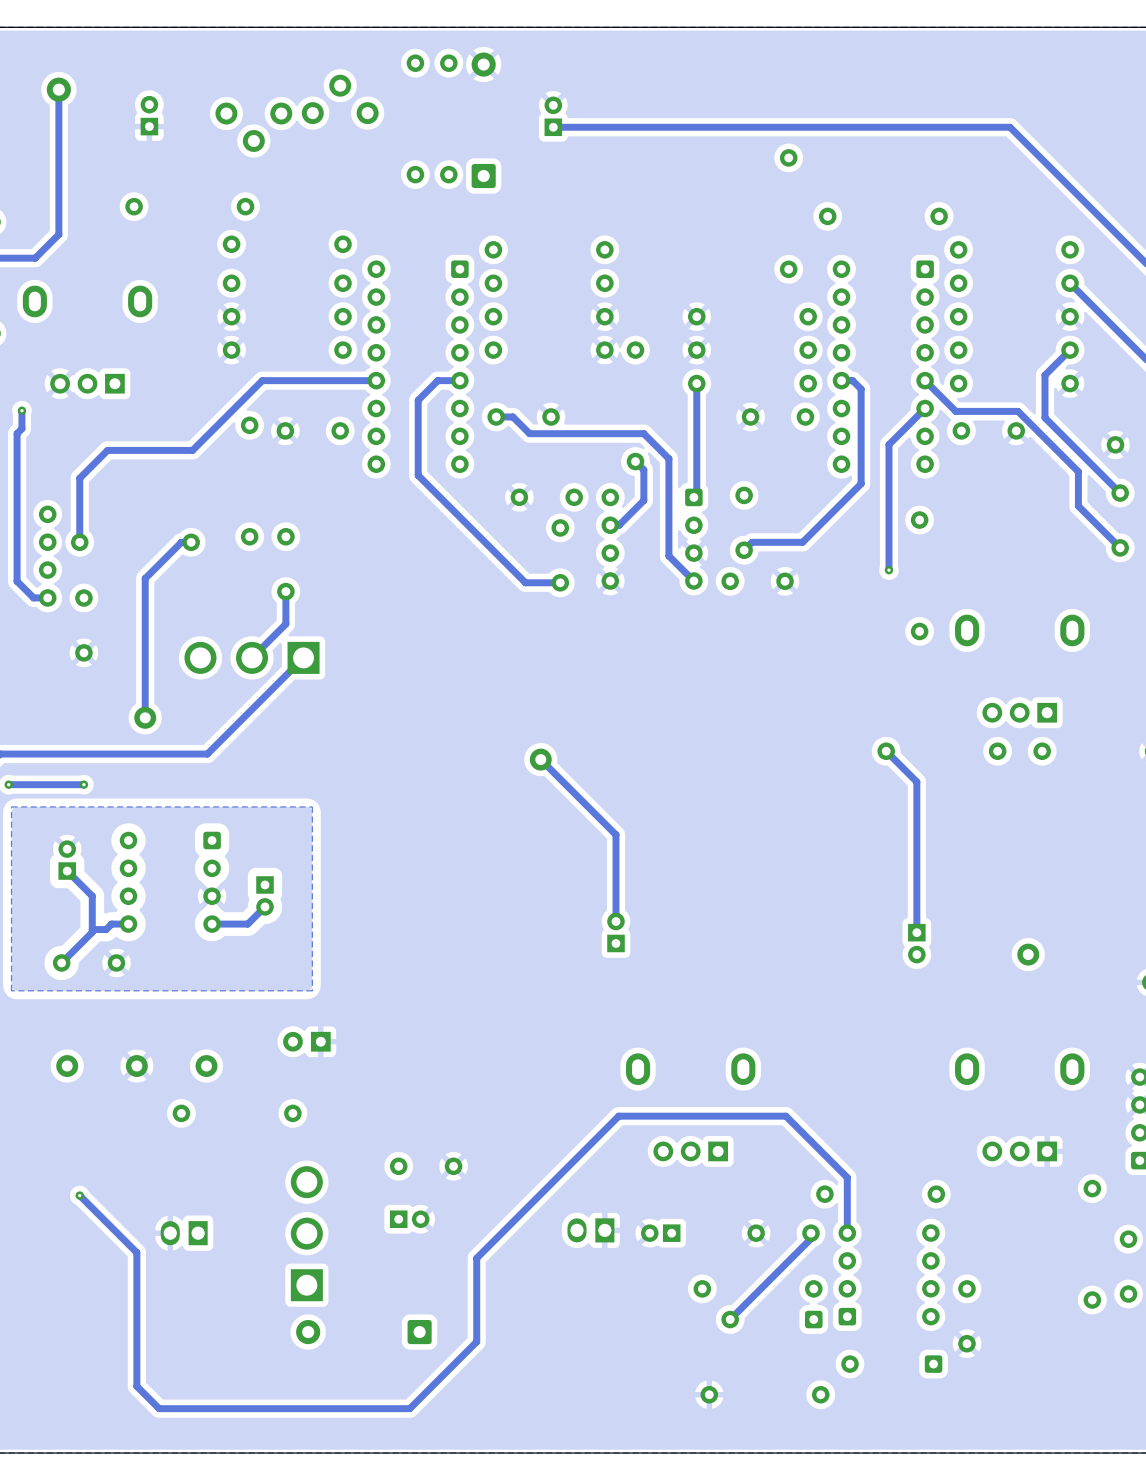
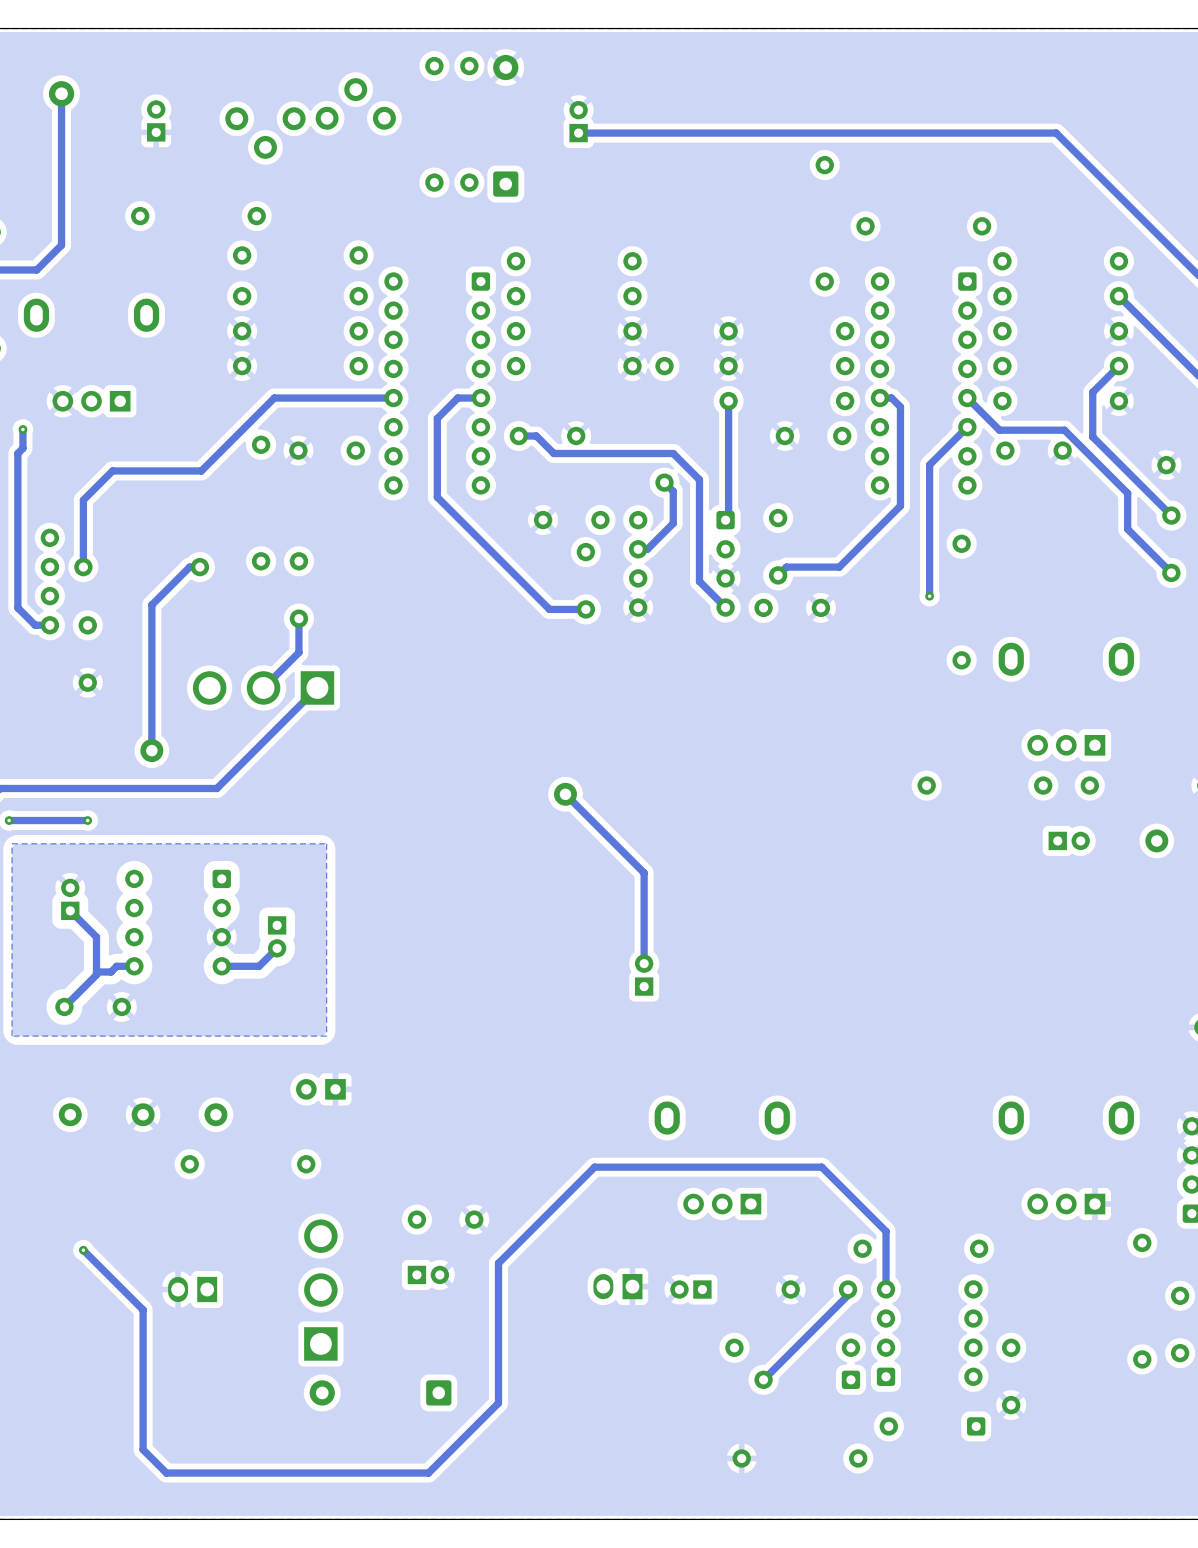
track: (886, 751) (916, 781) (916, 932) -> none
part rotation: 0° (916, 943) -> 90° counterclockwise (1069, 840)
part position: (916, 943) -> (1069, 840)
part position: (1028, 954) -> (1156, 840)
track: (618, 1116) (476, 1258) -> (647, 1167) (594, 1167) (498, 1263) (498, 1315)

